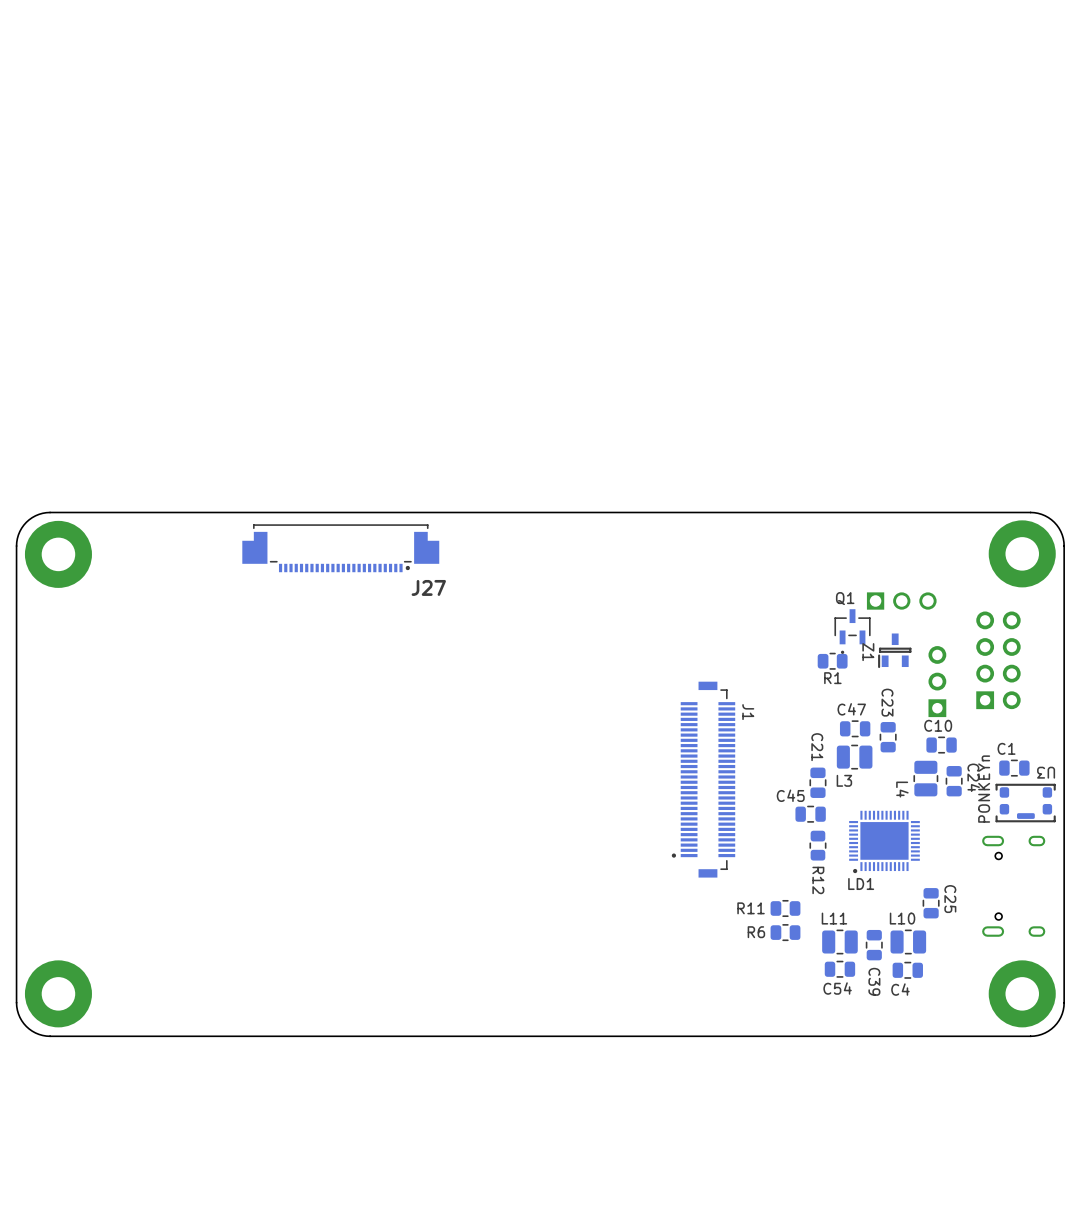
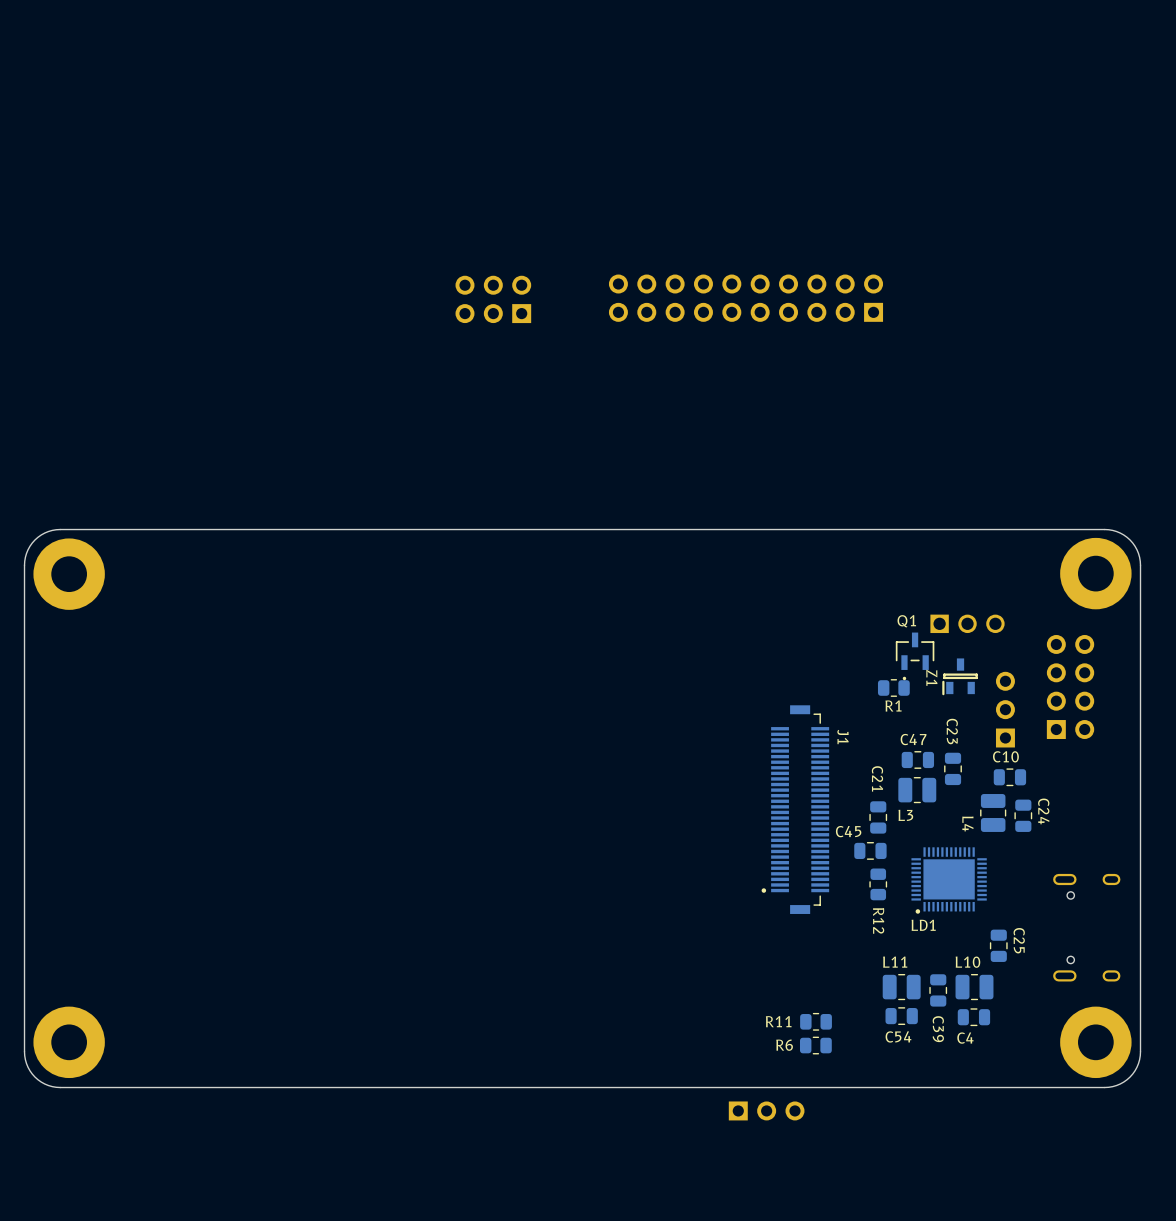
part: none -> (746, 298)
part: none -> (493, 299)
J27: (340, 548) -> none
C1: (1014, 768) -> none
J1 position: (703, 779) -> (795, 809)
text: PONKEYn (984, 789) -> none
U3: (1025, 803) -> none
R11 position: (785, 908) -> (816, 1021)
R6 position: (785, 932) -> (815, 1045)
part: none -> (766, 1110)

